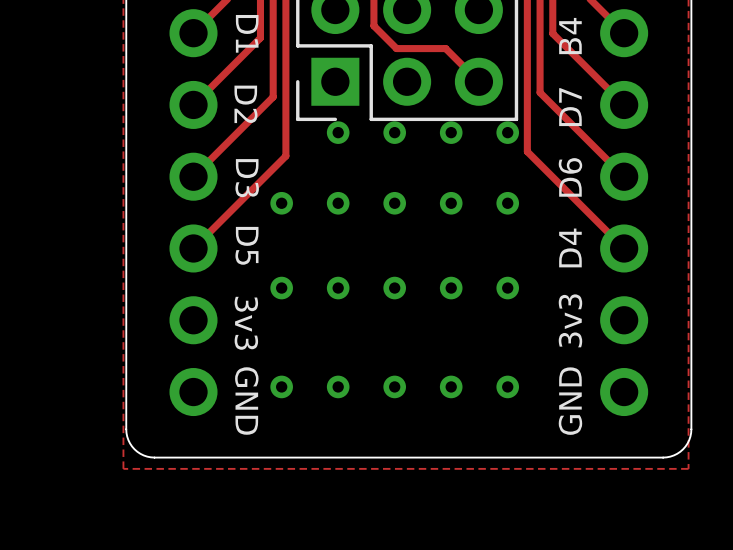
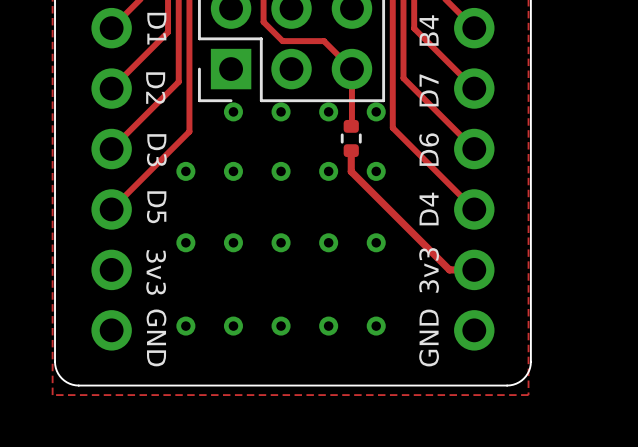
track: none -> (351, 69) (351, 126)
part: none -> (351, 138)
track: none -> (351, 150) (351, 171) (449, 269) (474, 269)

